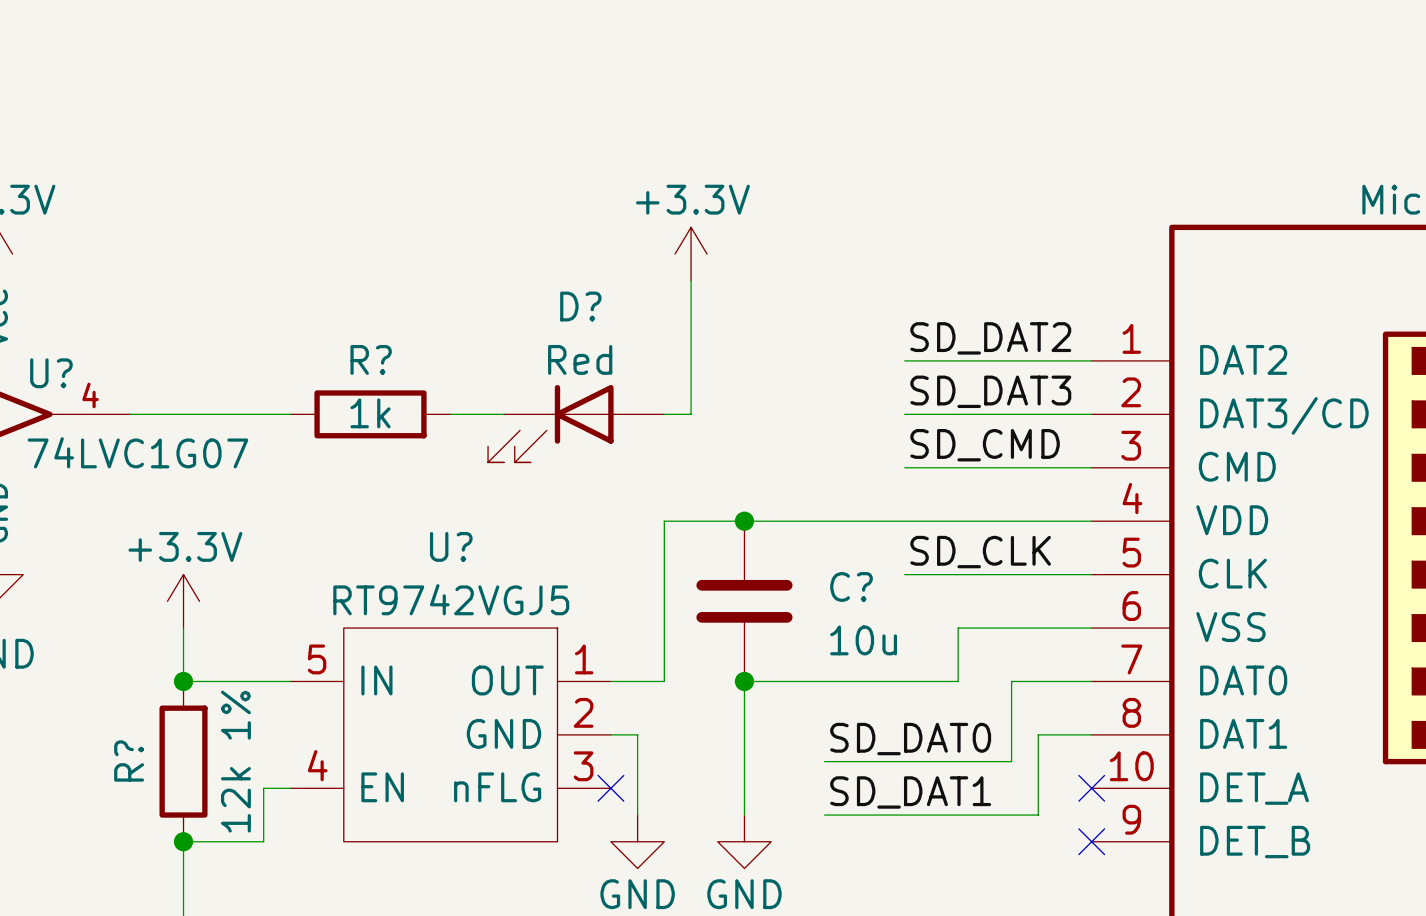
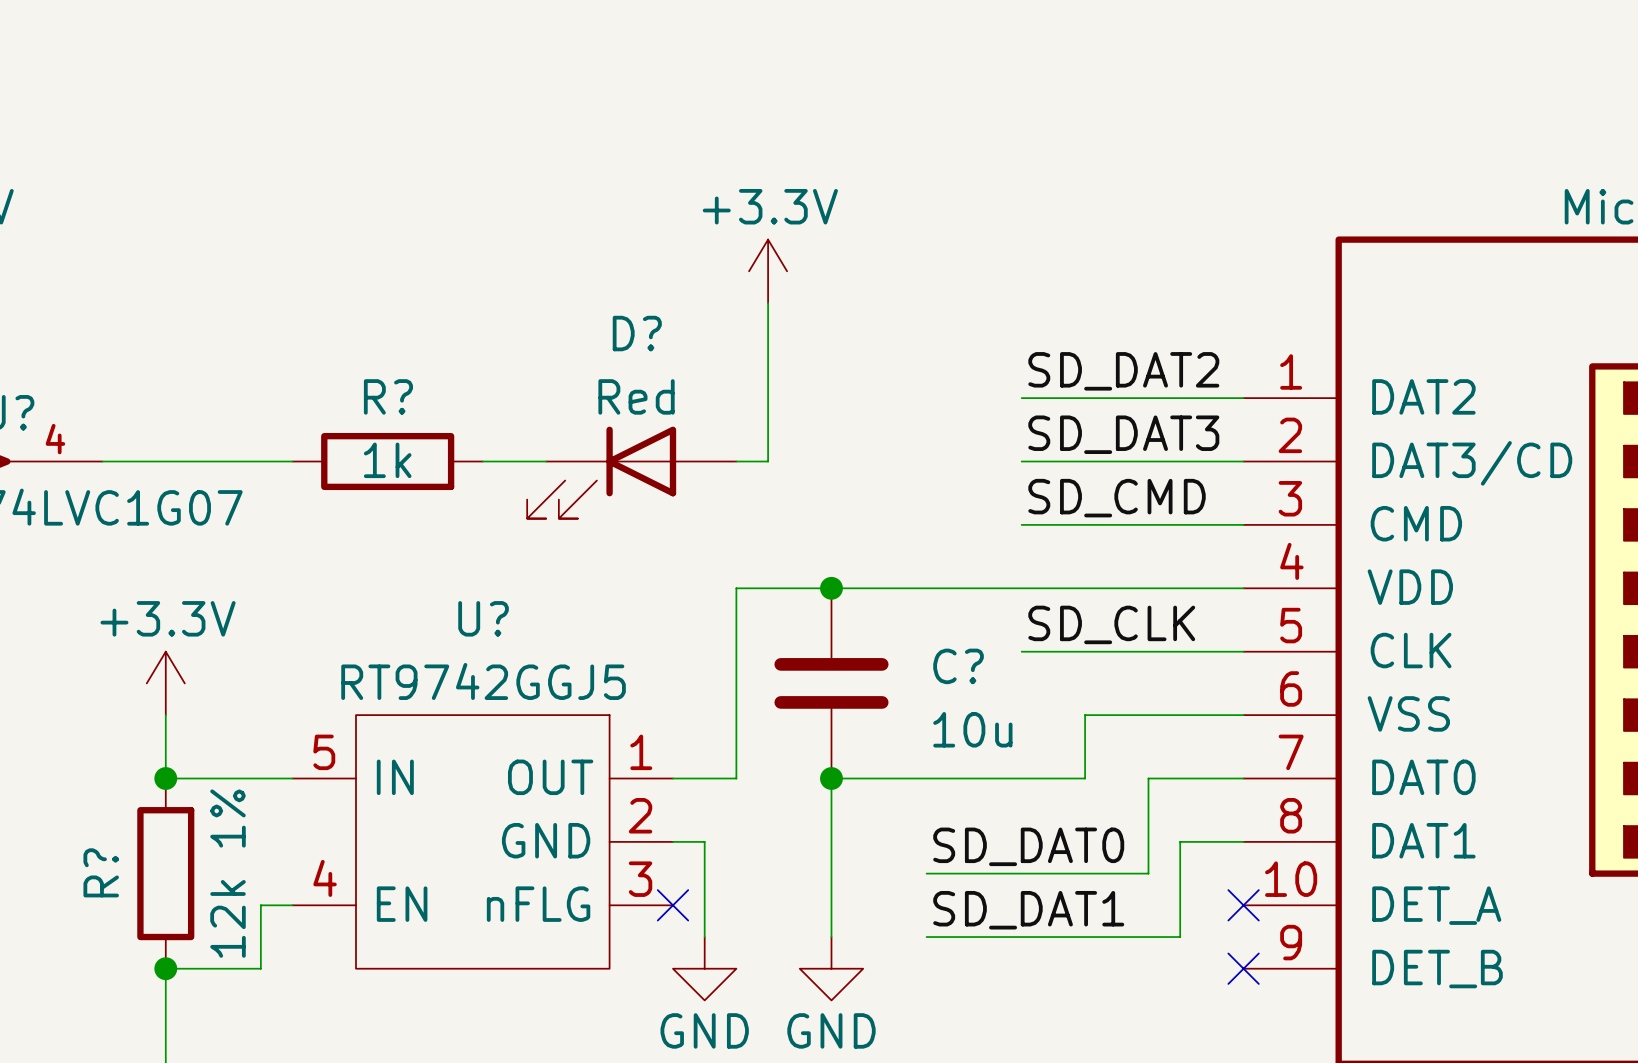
U? value: RT9742VGJ5 (451, 599) -> RT9742GGJ5 (483, 681)

